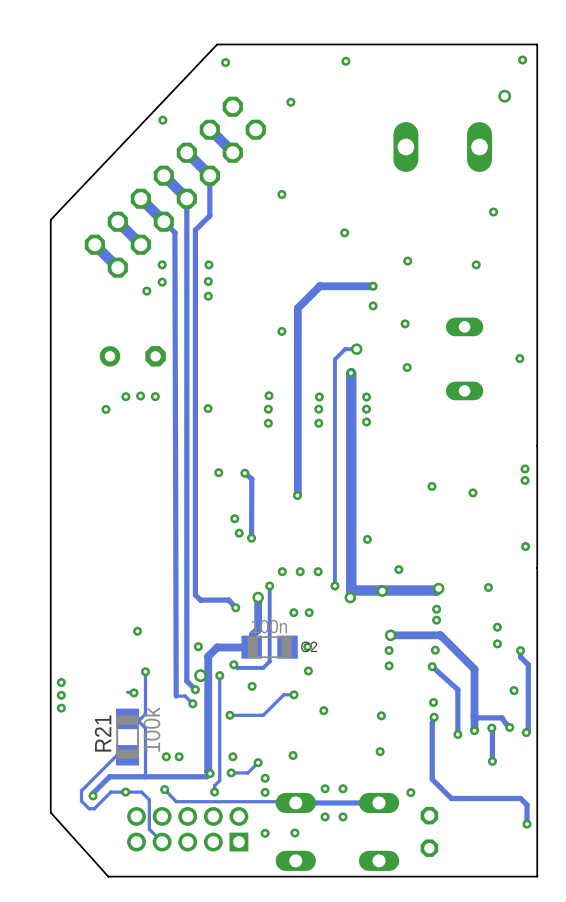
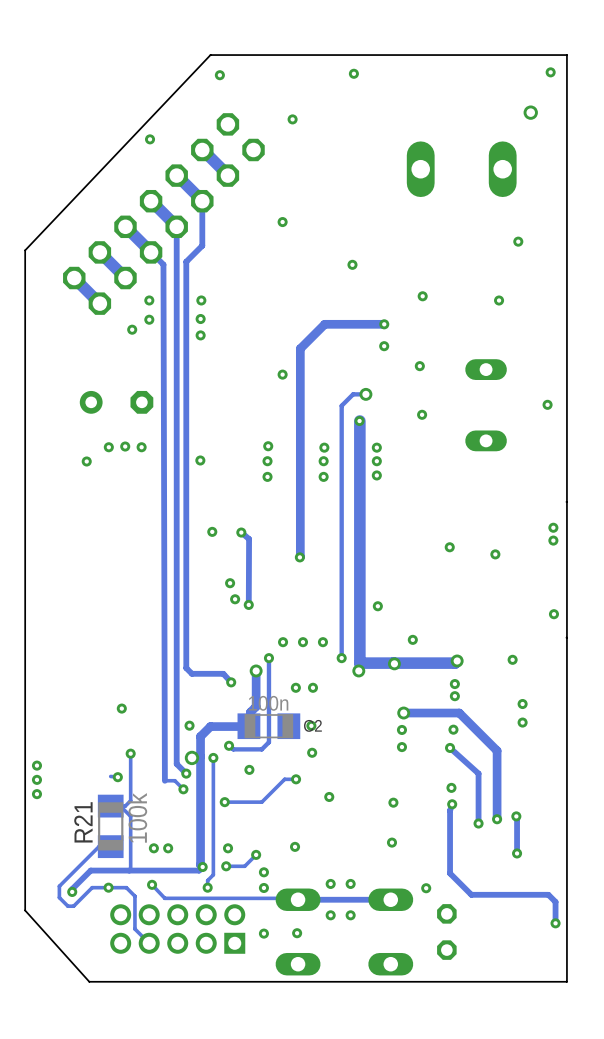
track: (520, 650) (520, 657) (528, 664) (528, 731) (526, 732) -> none
via: (520, 650) -> none
via: (514, 690) -> none
track: (474, 716) (502, 717) (509, 727) -> none
via: (509, 727) -> none
via: (526, 732) -> none

